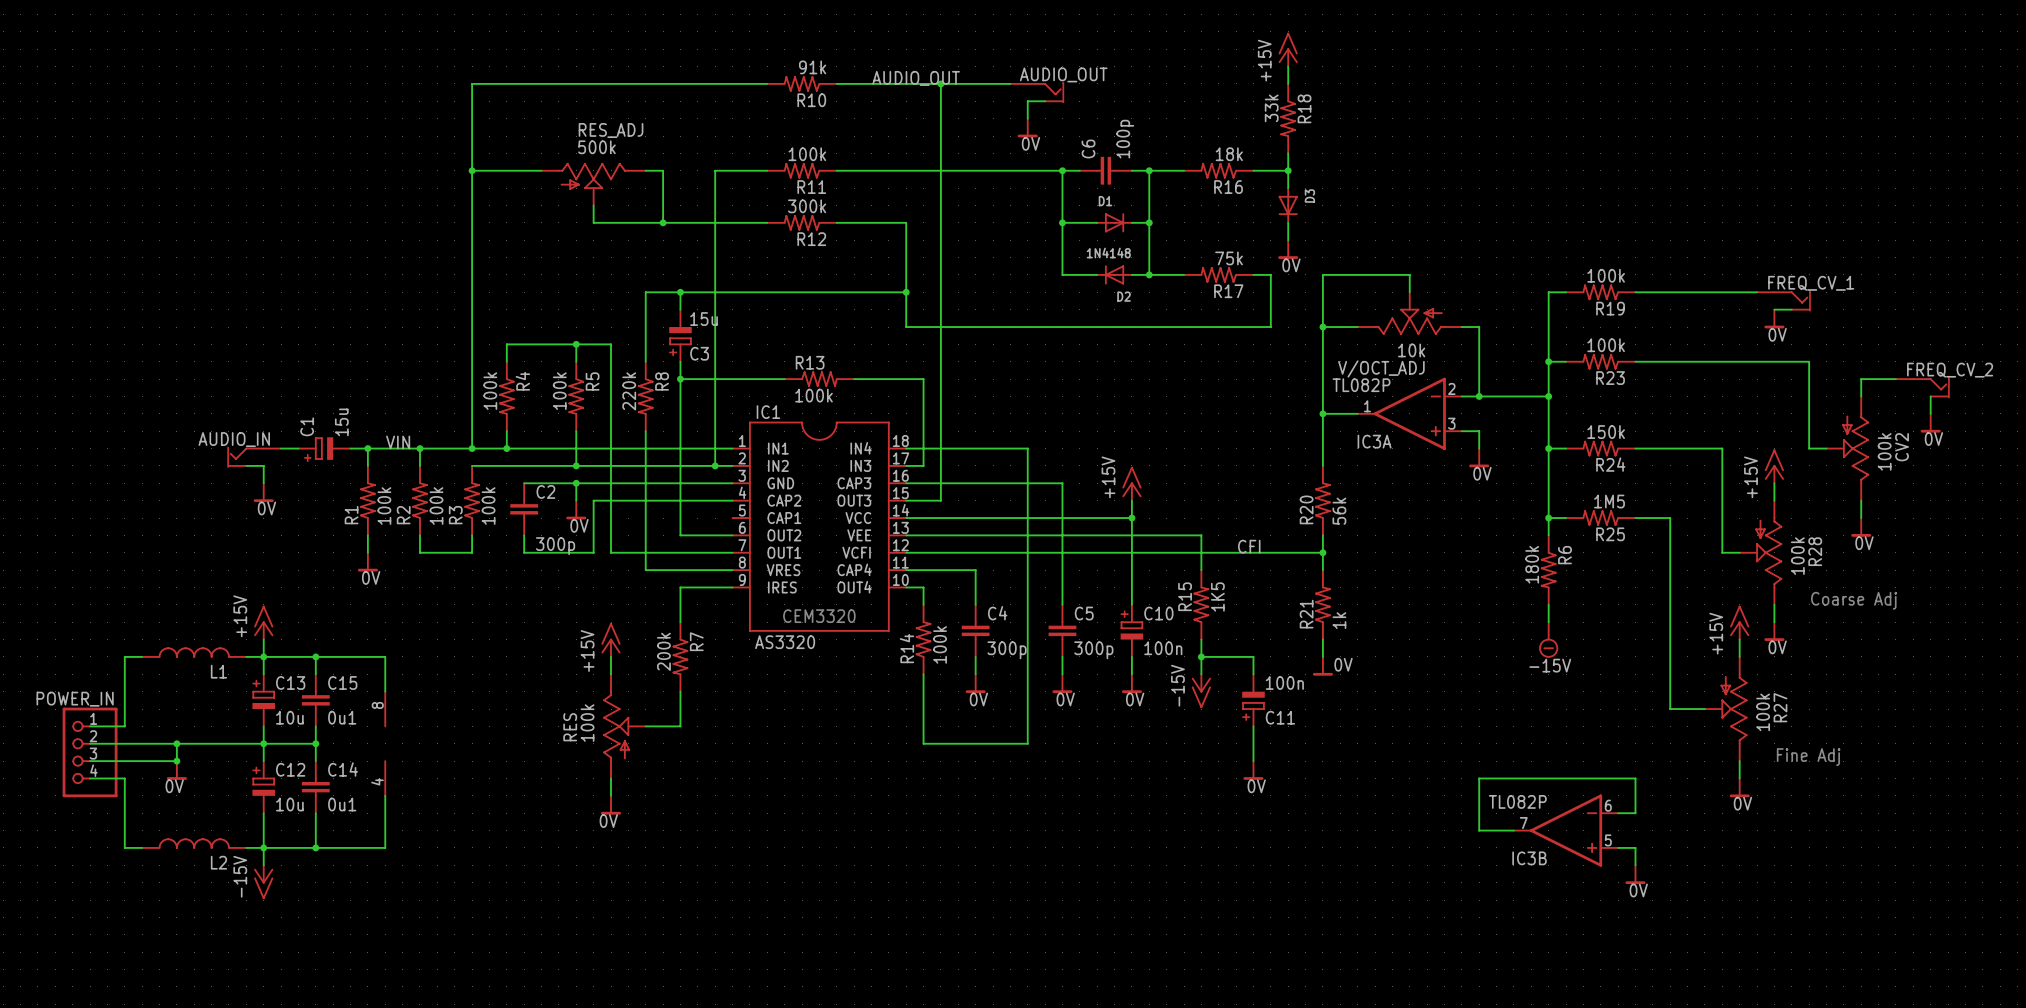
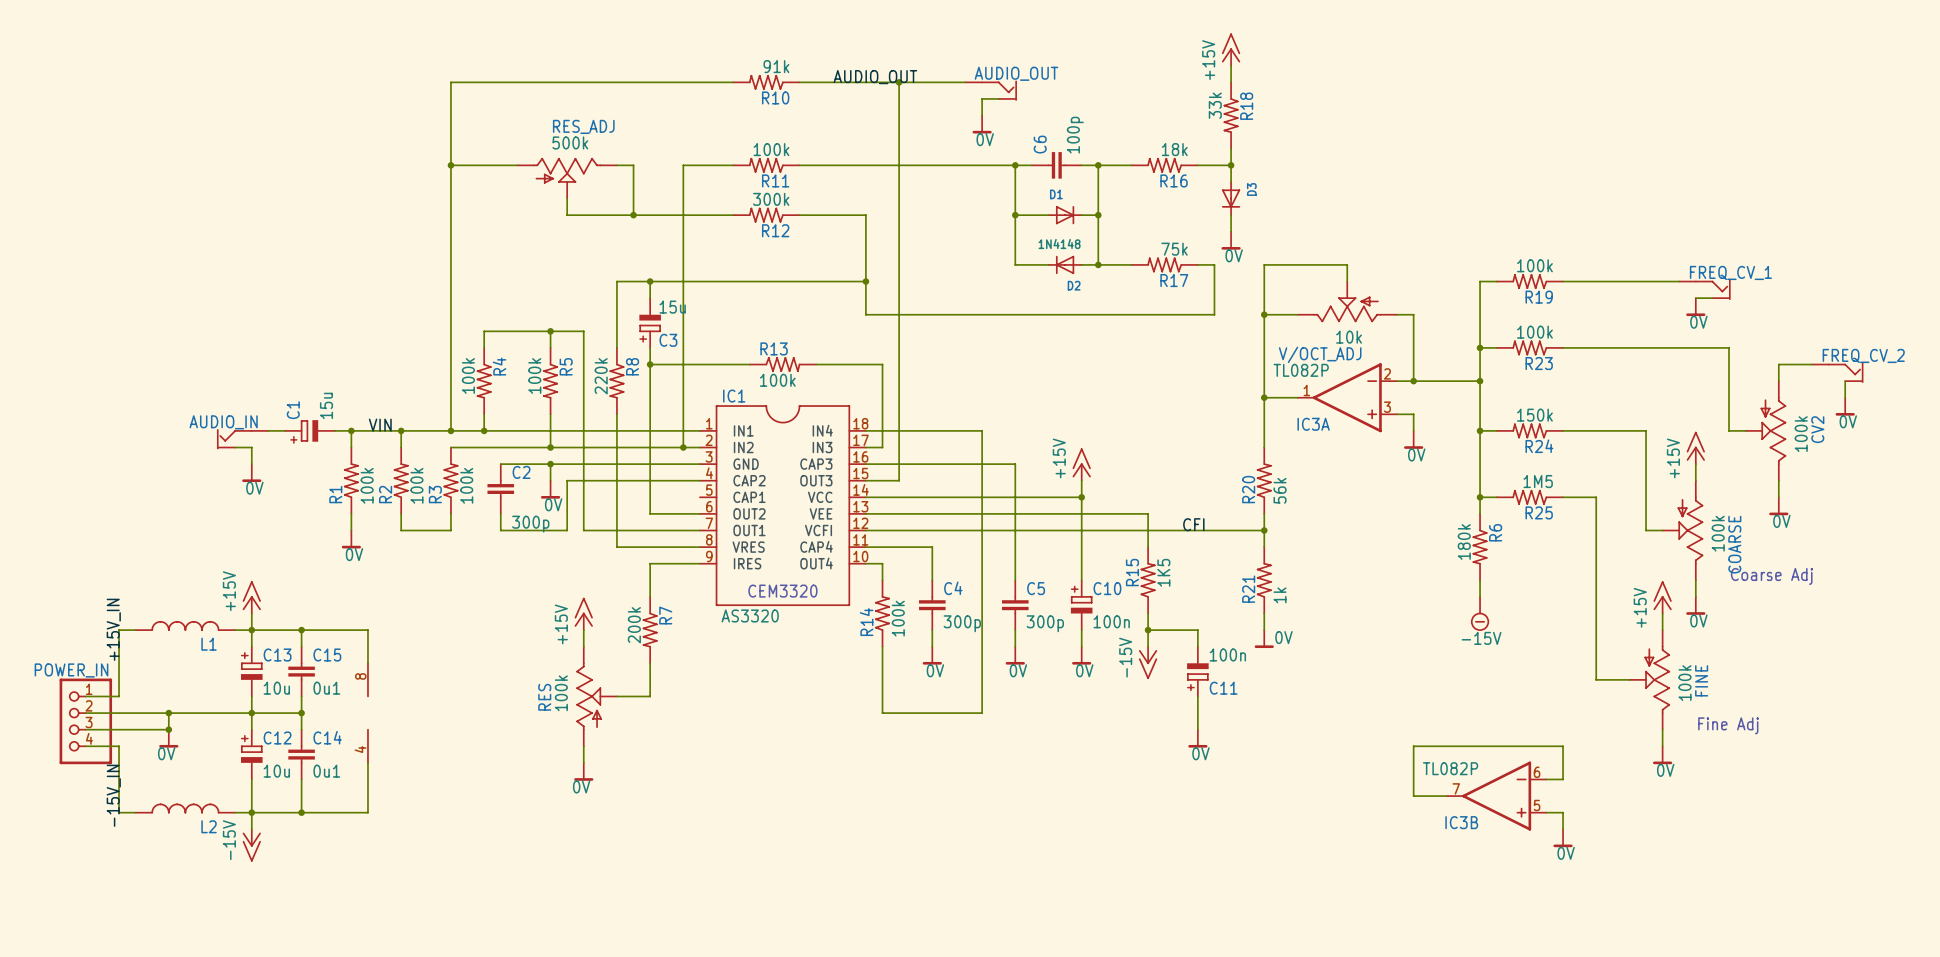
R28 name: R28 (1815, 551) -> COARSE (1734, 544)
label: none -> +15V_IN (113, 629)
R27 name: R27 (1780, 707) -> FINE (1701, 680)
label: none -> -15V_IN (113, 795)

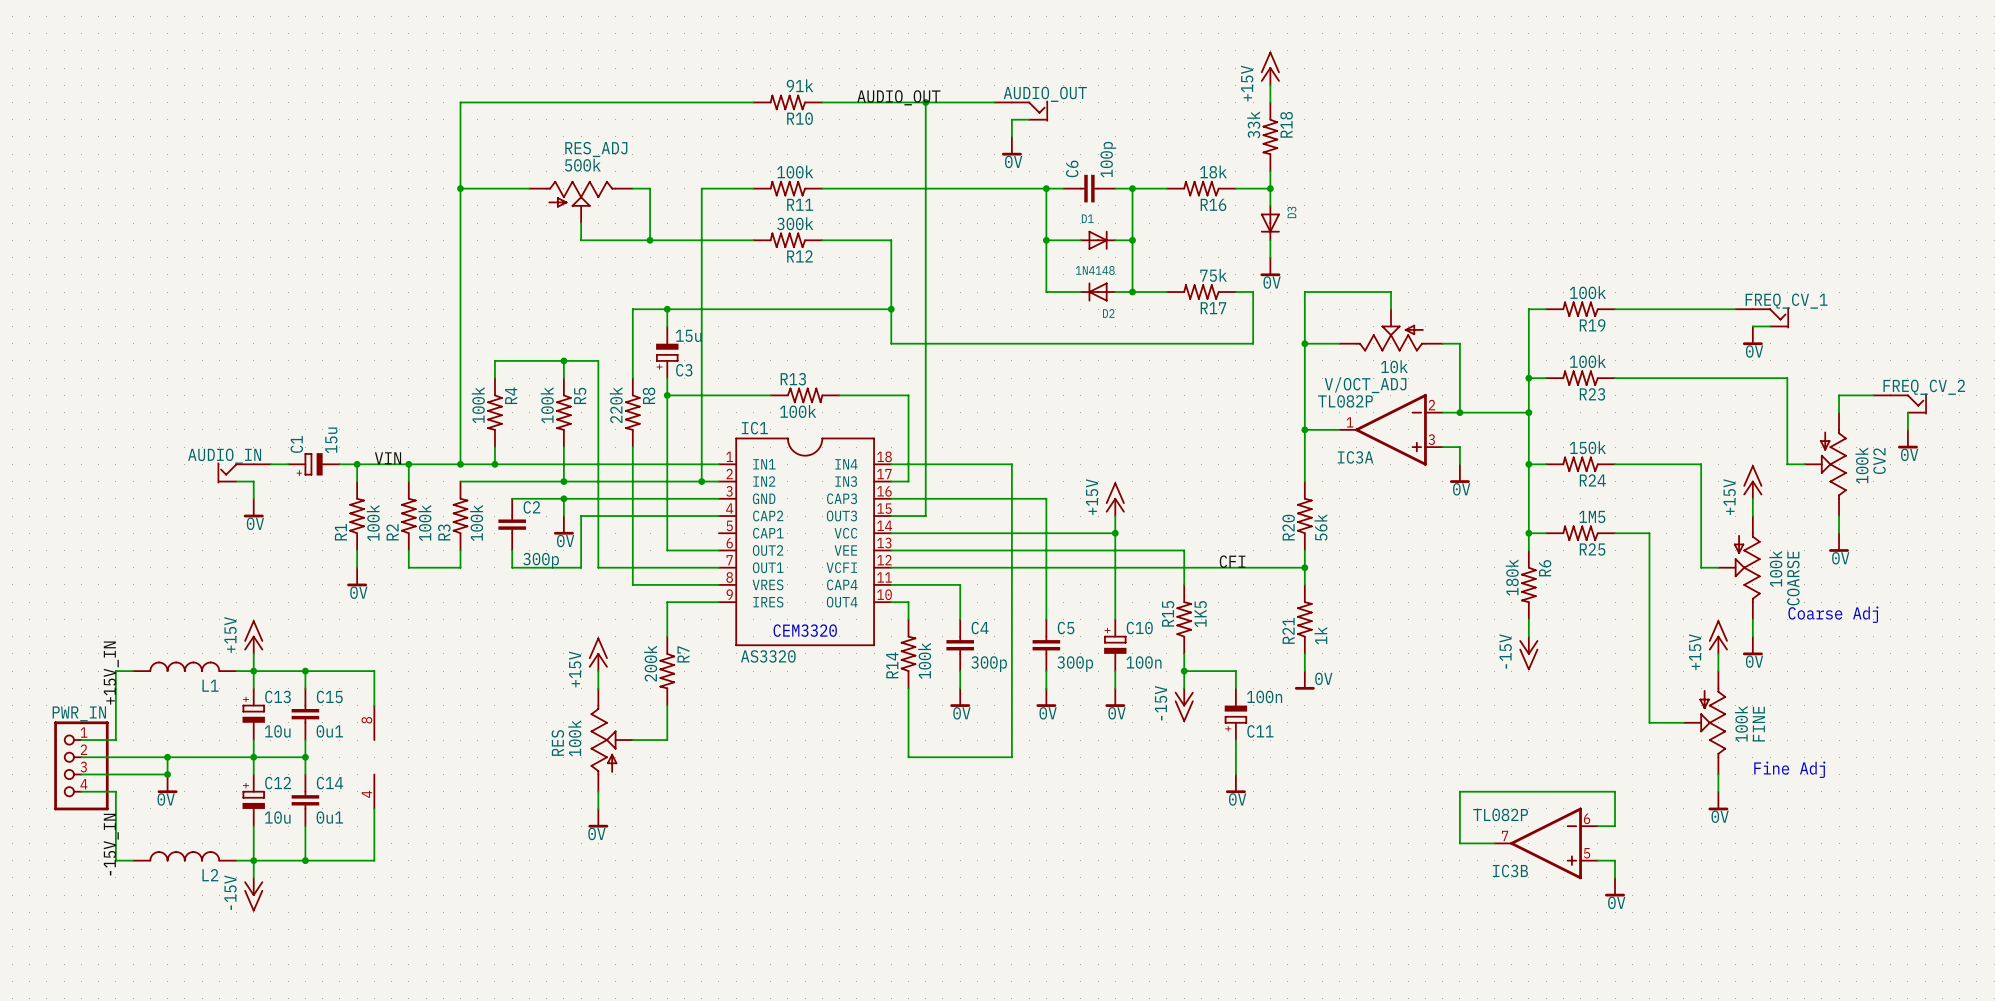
power symbol shape: [1470, 596, 1490, 631] -> [1519, 636, 1539, 671]
power symbol text position: -15V (1481, 638) -> -15V (1505, 651)
POWER_IN name: POWER_IN (71, 670) -> PWR_IN (79, 713)

